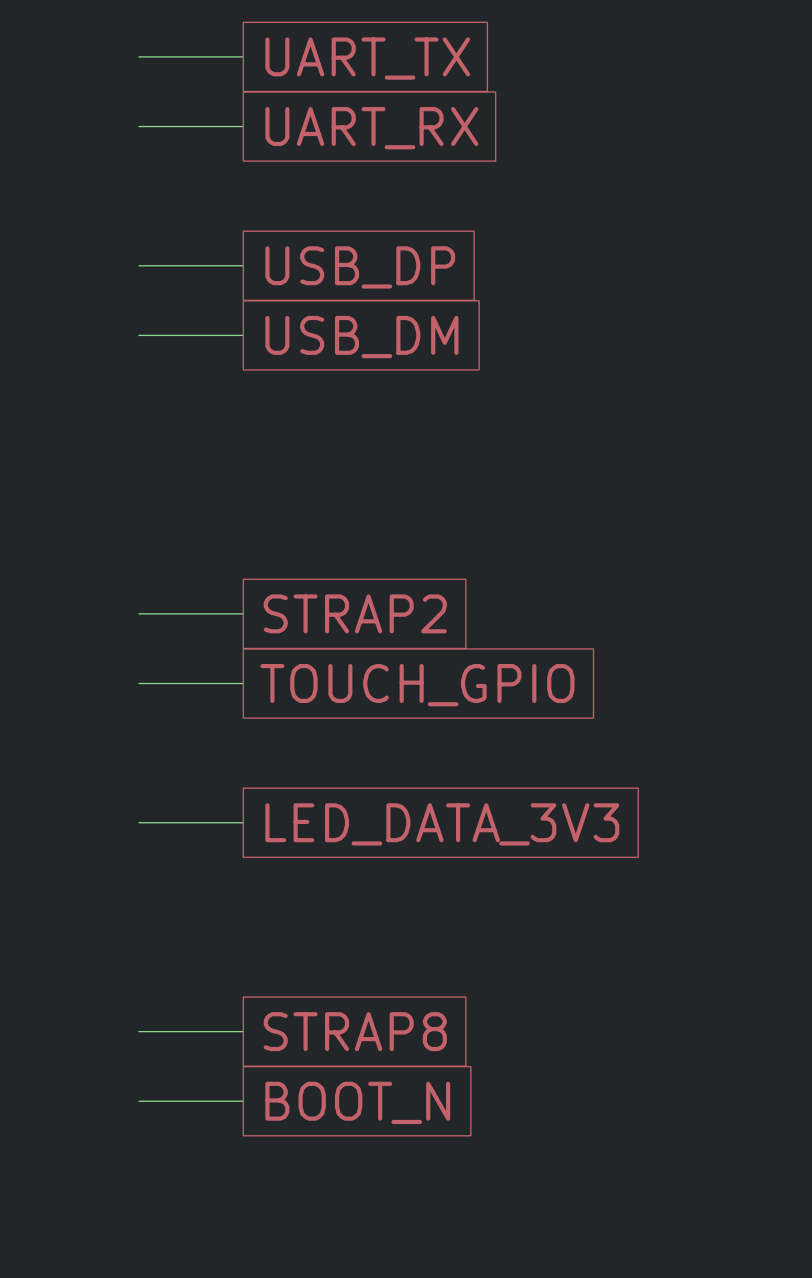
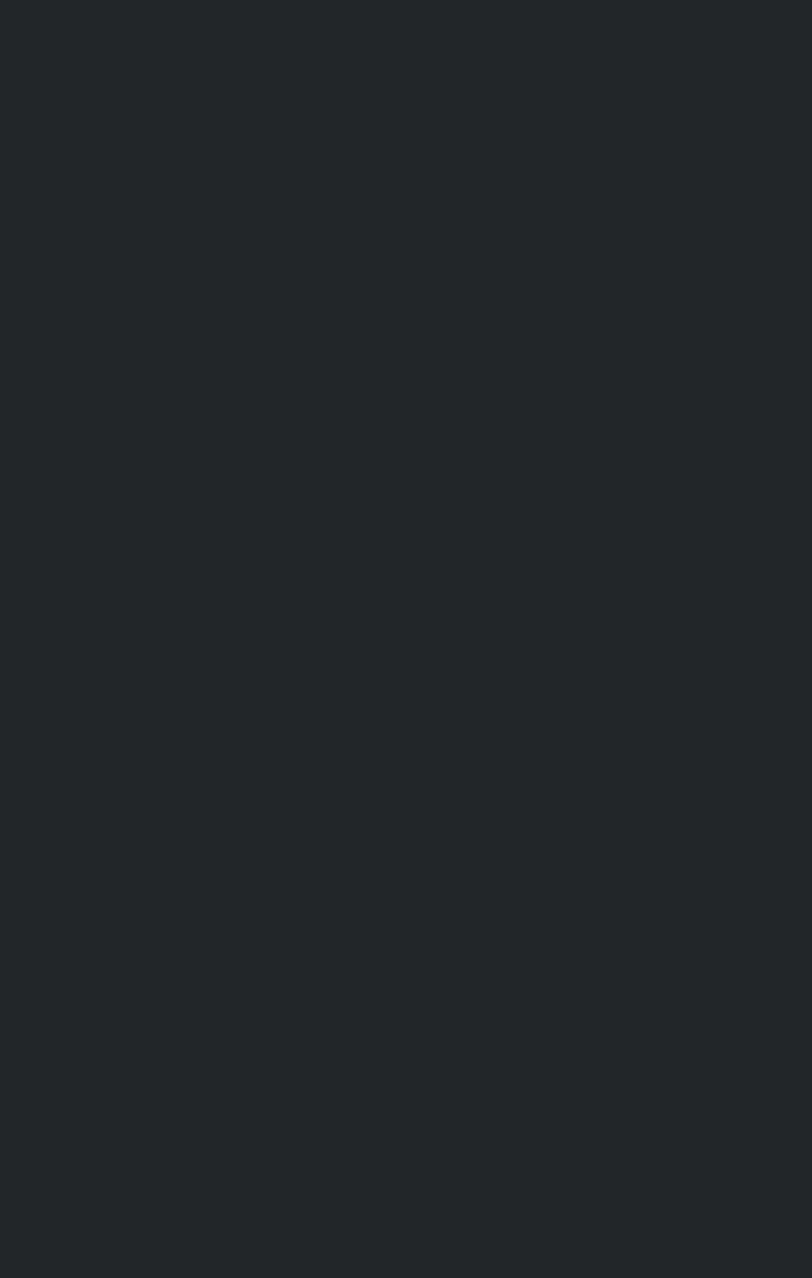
wire: (138, 56) (243, 56) -> none
global label: UART_TX (367, 58) -> none
wire: (138, 126) (243, 126) -> none
global label: UART_RX (371, 128) -> none
wire: (138, 265) (243, 265) -> none
global label: USB_DP (360, 267) -> none
wire: (138, 335) (243, 335) -> none
global label: USB_DM (361, 337) -> none
wire: (138, 613) (243, 613) -> none
global label: STRAP2 (355, 613) -> none
wire: (138, 683) (243, 683) -> none
global label: TOUCH_GPIO (417, 685) -> none
wire: (138, 822) (243, 822) -> none
global label: LED_DATA_3V3 (442, 824) -> none
wire: (138, 1031) (243, 1031) -> none
global label: STRAP8 (355, 1031) -> none
wire: (138, 1101) (243, 1101) -> none
global label: BOOT_N (357, 1102) -> none

